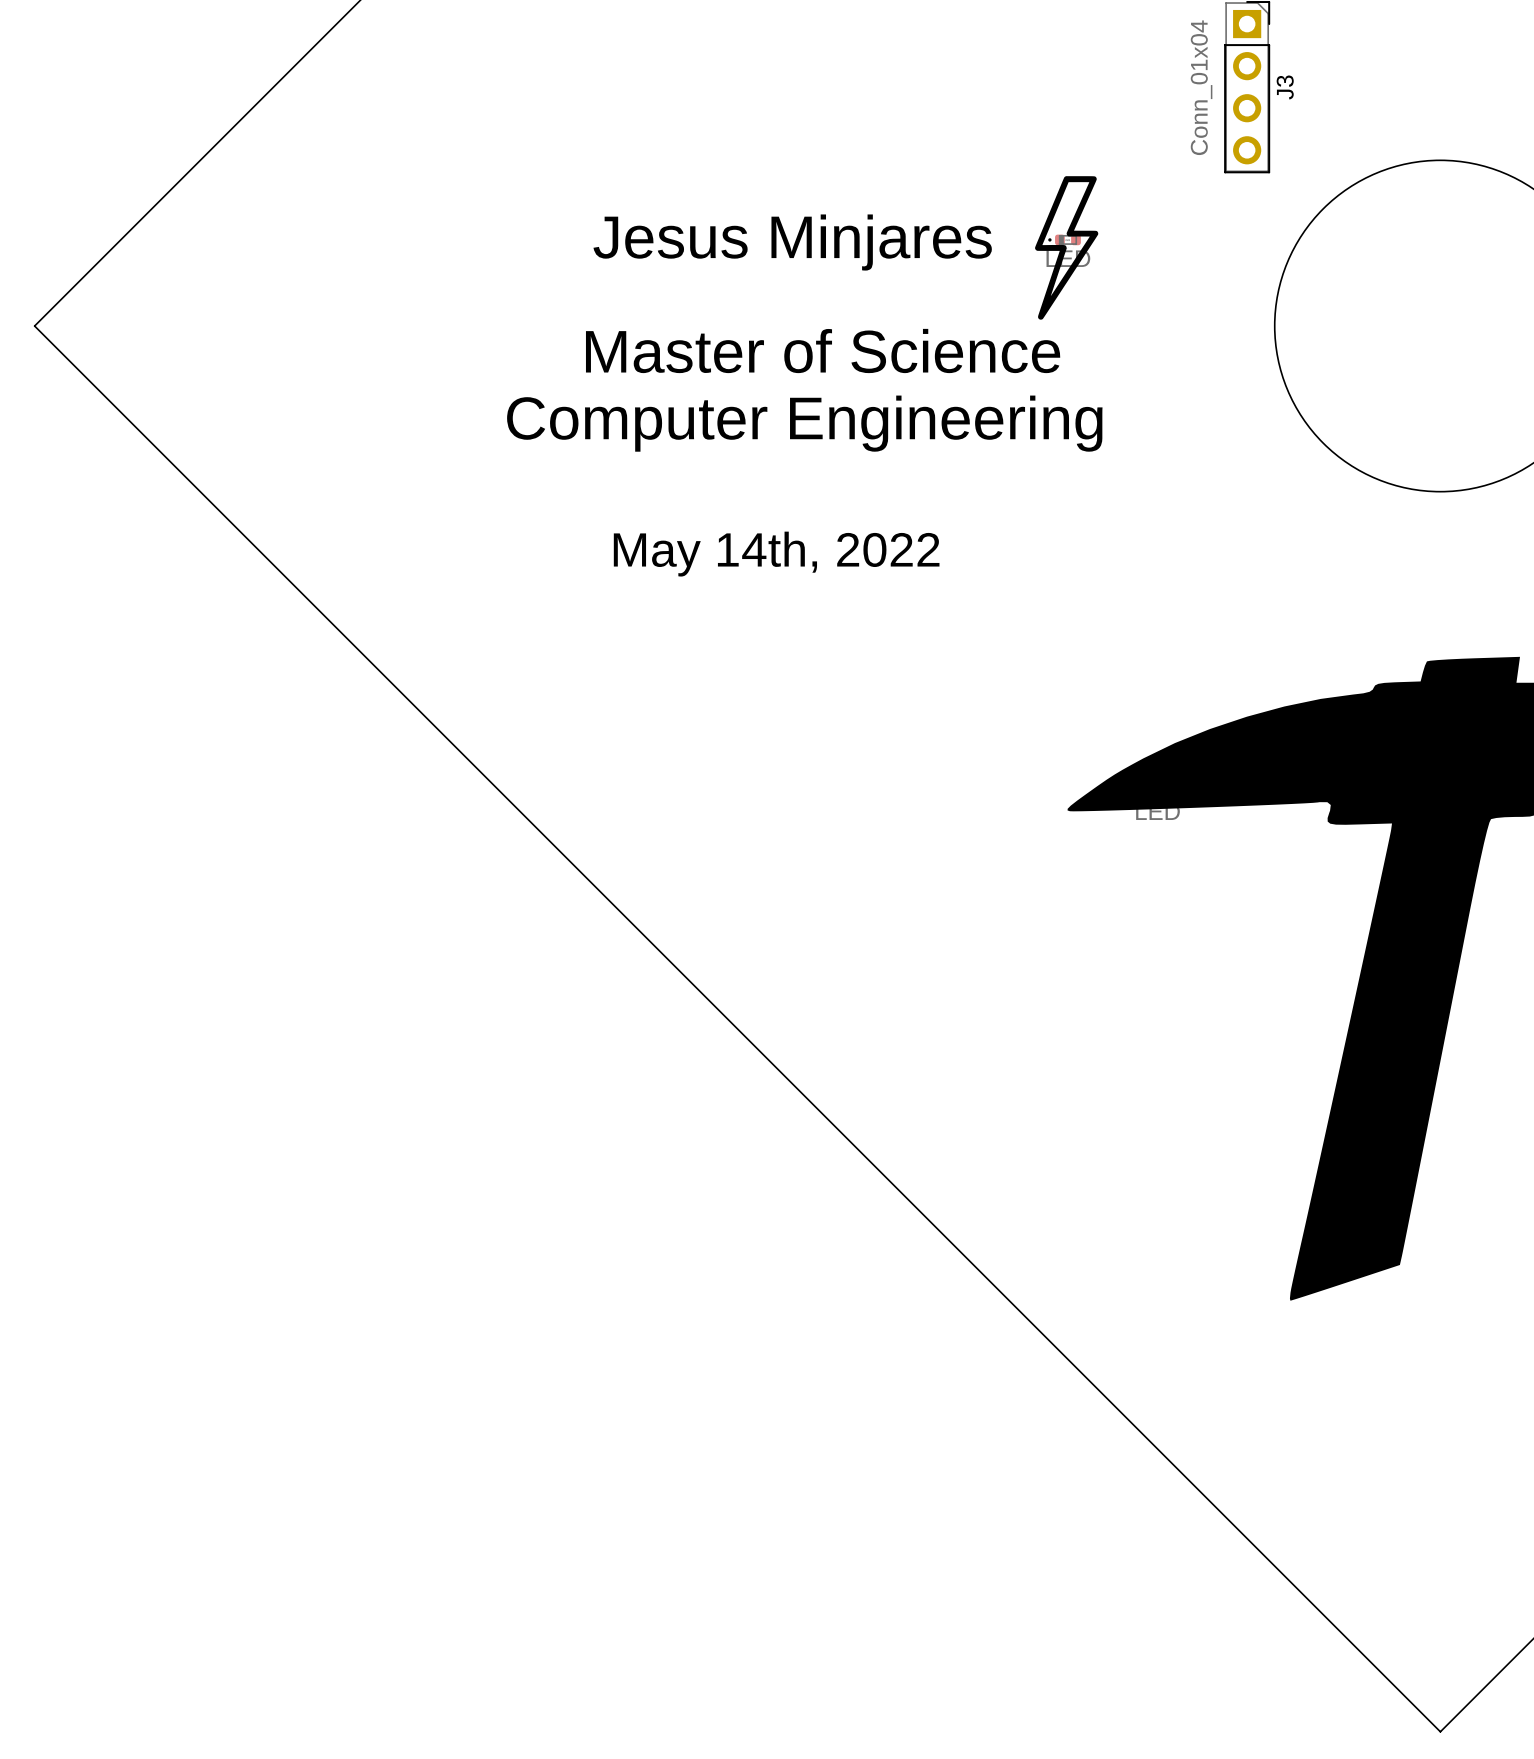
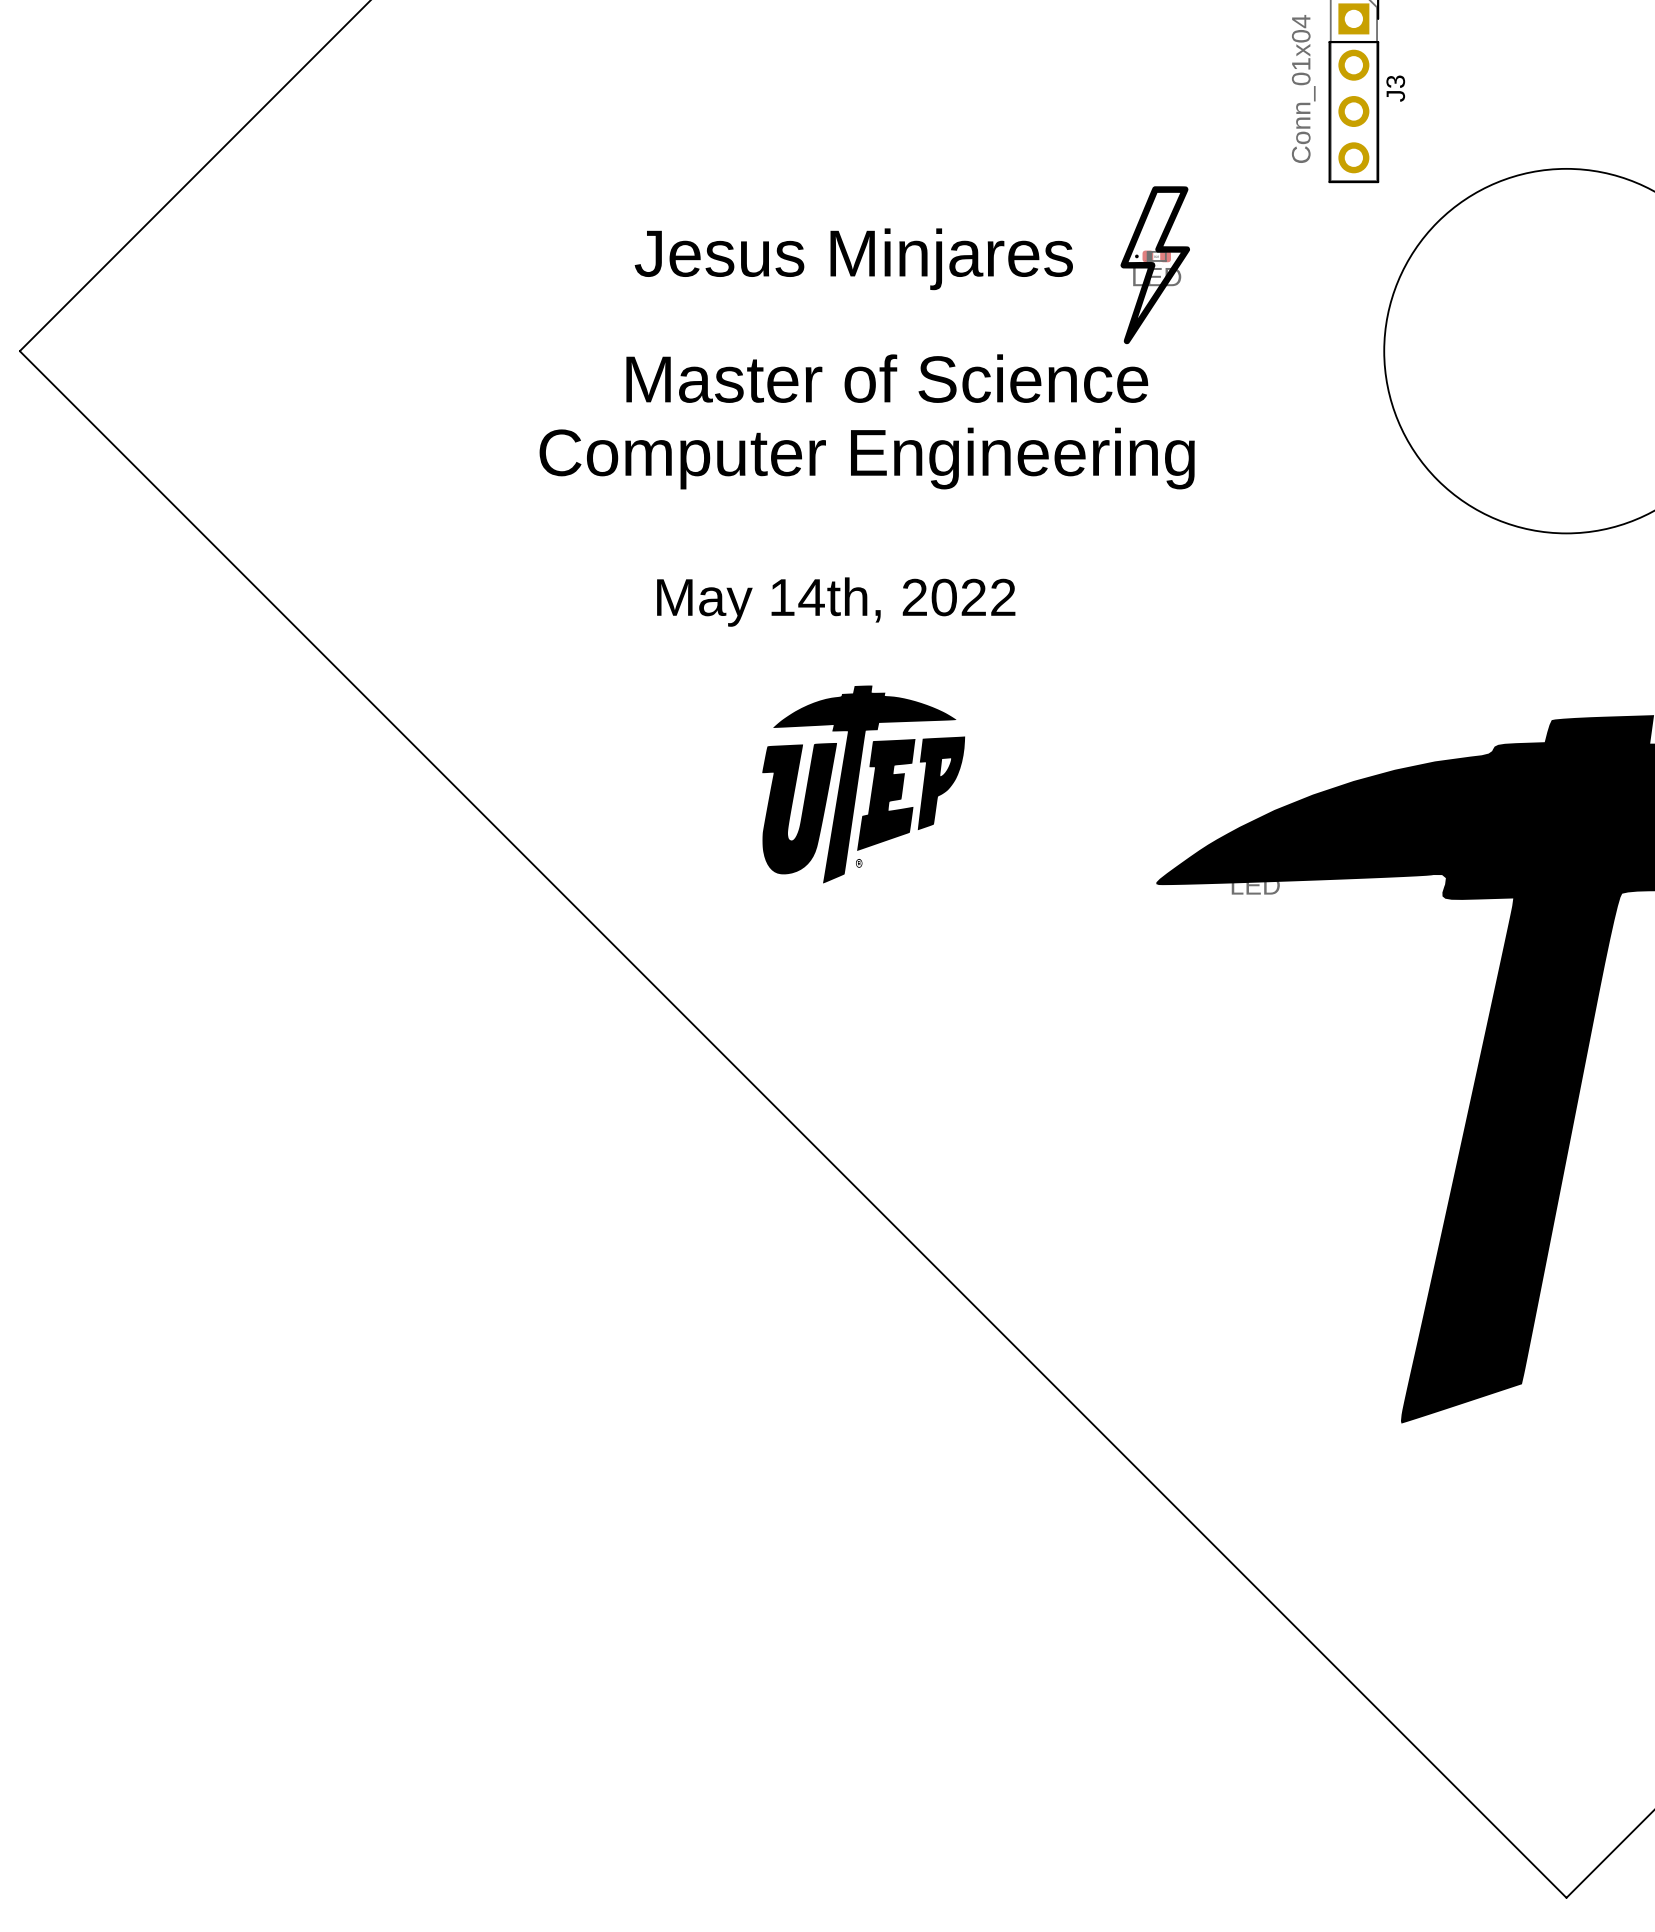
part: none -> (863, 784)

